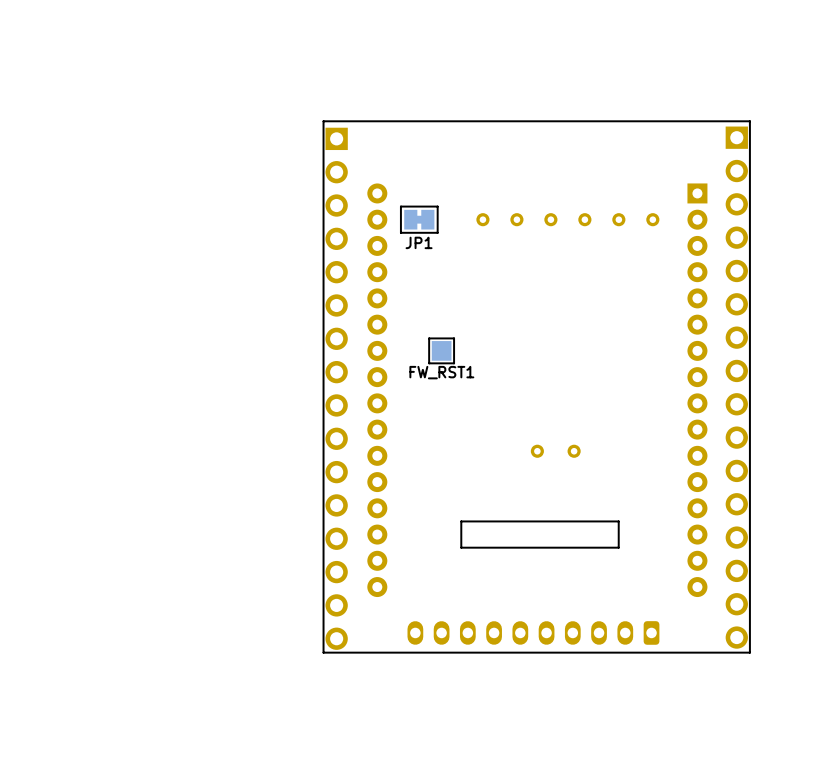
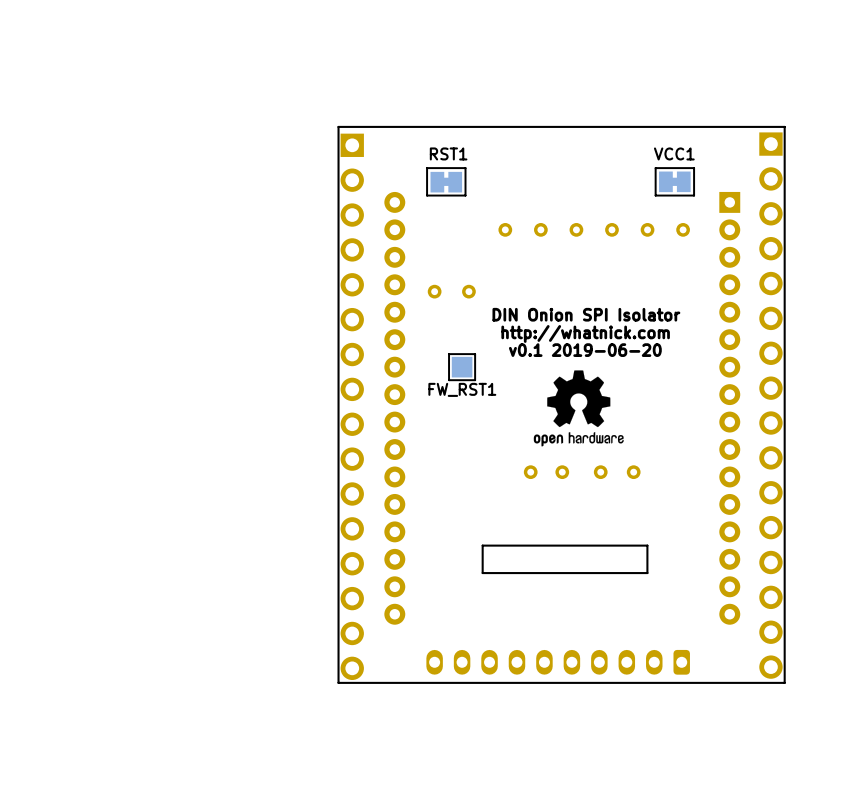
RST1: none -> (446, 181)
VCC1: none -> (674, 181)
JP1: (419, 219) -> none
part: none -> (434, 291)
part: none -> (468, 291)
text: none -> DIN Onion SPI Isolator (586, 314)
text: none -> http://whatnick.com (585, 333)
text: none -> v0.1 2019-06-20 (585, 350)
drawing: none -> [533, 370, 624, 447]
part: none -> (530, 472)
part: none -> (633, 472)

